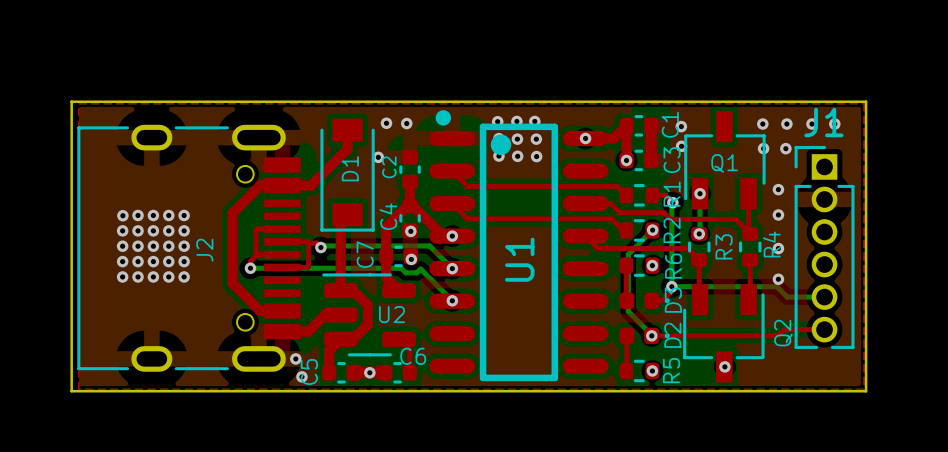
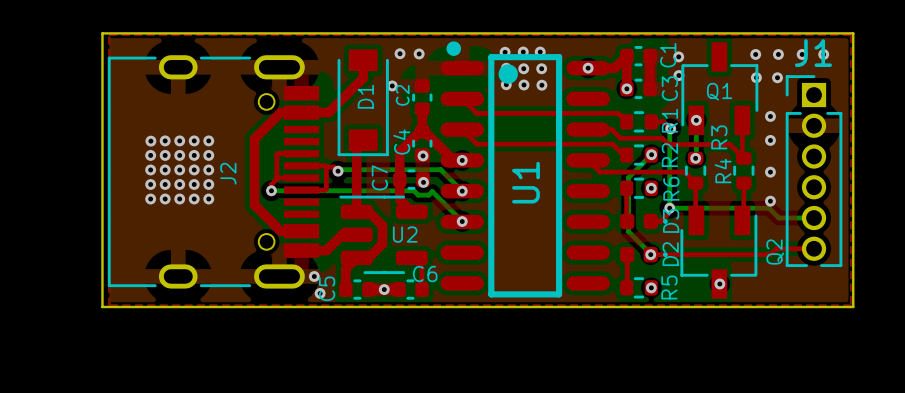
R4 name position: R4 (771, 244) -> R4 (723, 170)
R3 name position: R3 (724, 246) -> R3 (719, 137)

